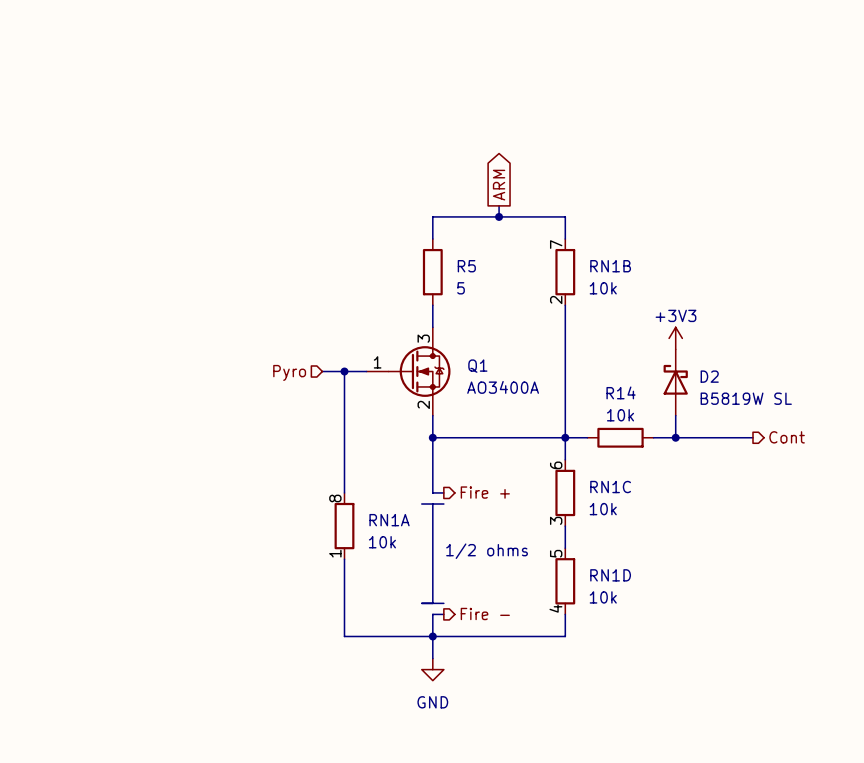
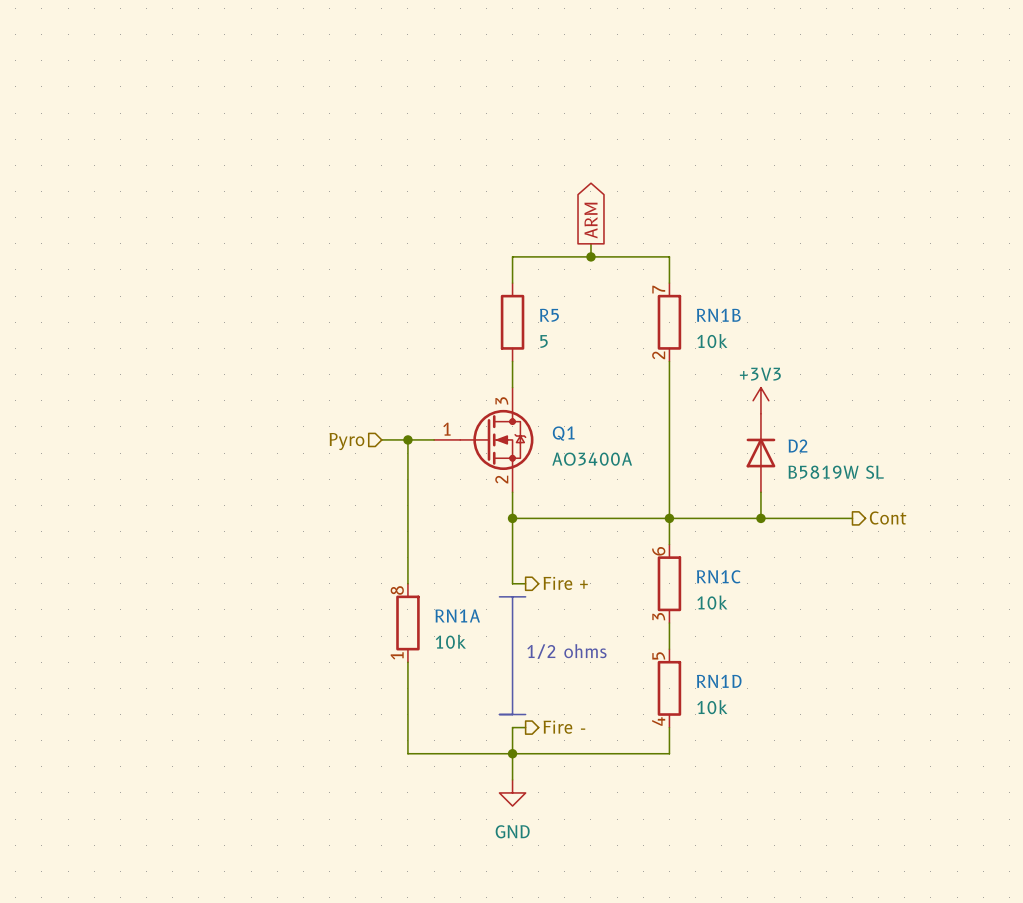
power symbol position: +3V3 (675, 338) -> +3V3 (760, 400)
D2 symbol: [663, 349, 688, 416] -> [746, 413, 776, 493]
wire: (675, 415) (675, 437) -> (760, 492) (760, 518)
wire: none -> (695, 518) (774, 518)
R14: 10k (620, 437) -> none
junction position: (675, 437) -> (760, 518)
wire: (719, 437) (753, 437) -> none
hierarchical label position: Cont (787, 437) -> Cont (888, 517)

